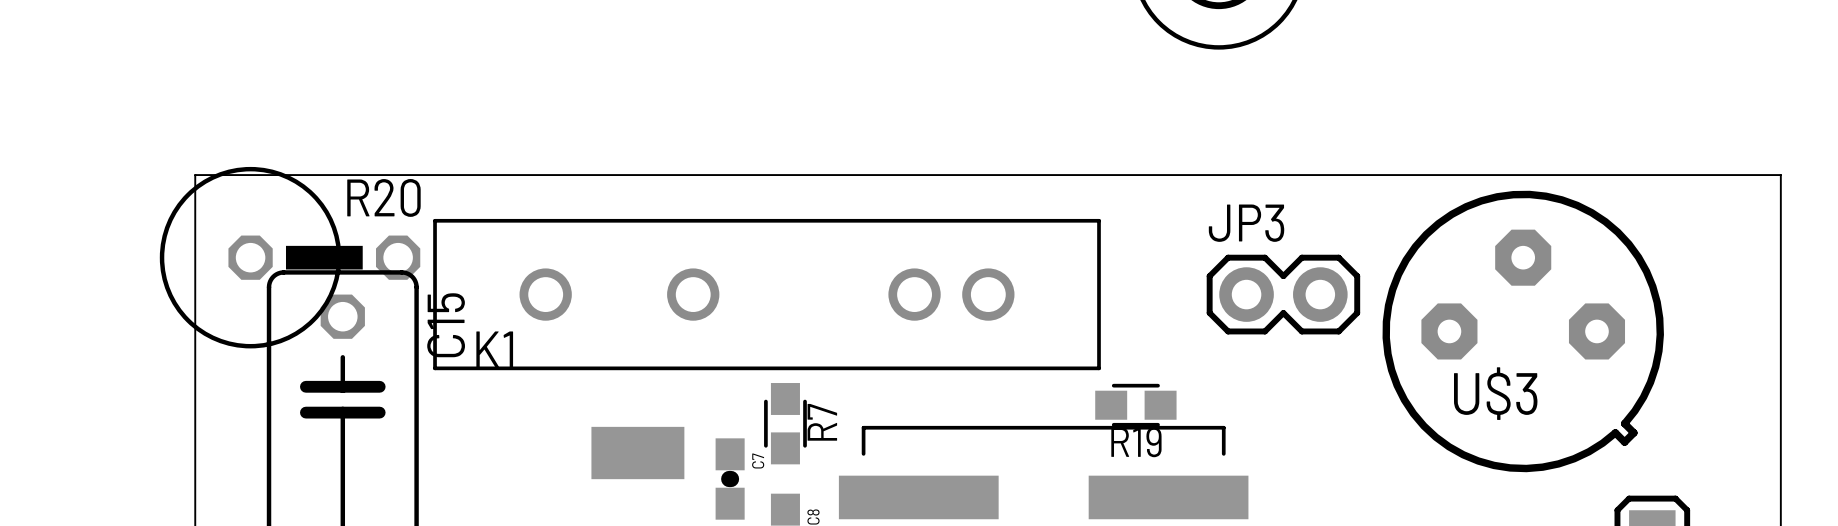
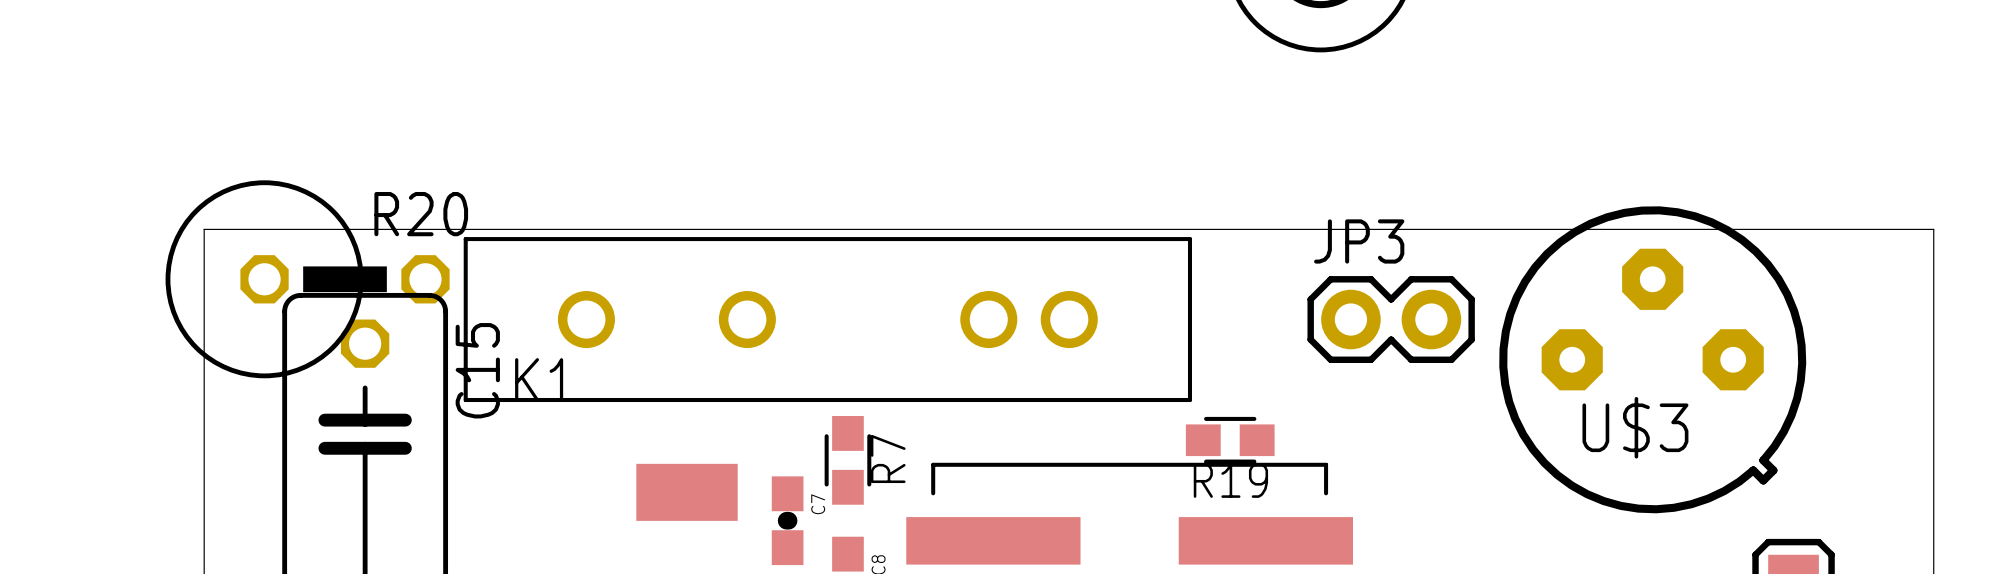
board edge: (195, 211) (195, 175) (1780, 175) (1780, 211) -> (204, 229) (1933, 229)

